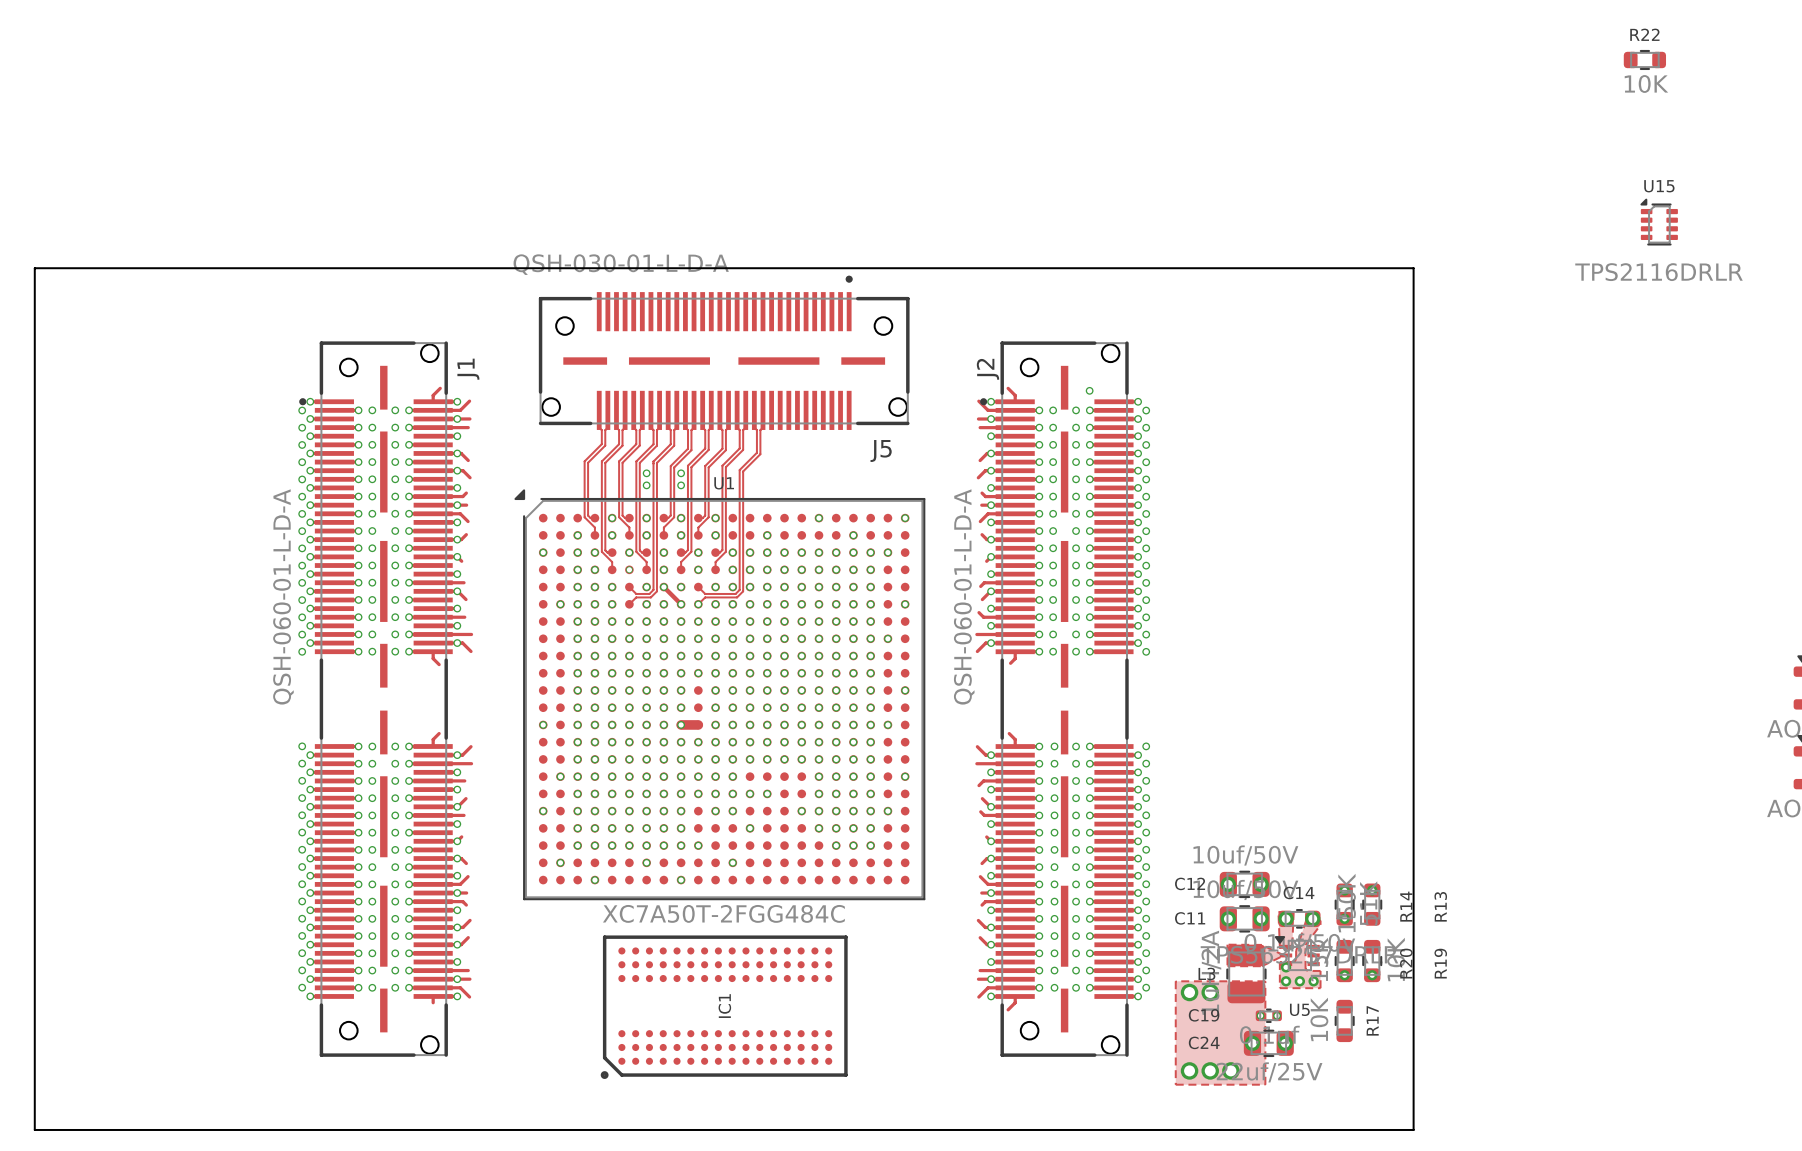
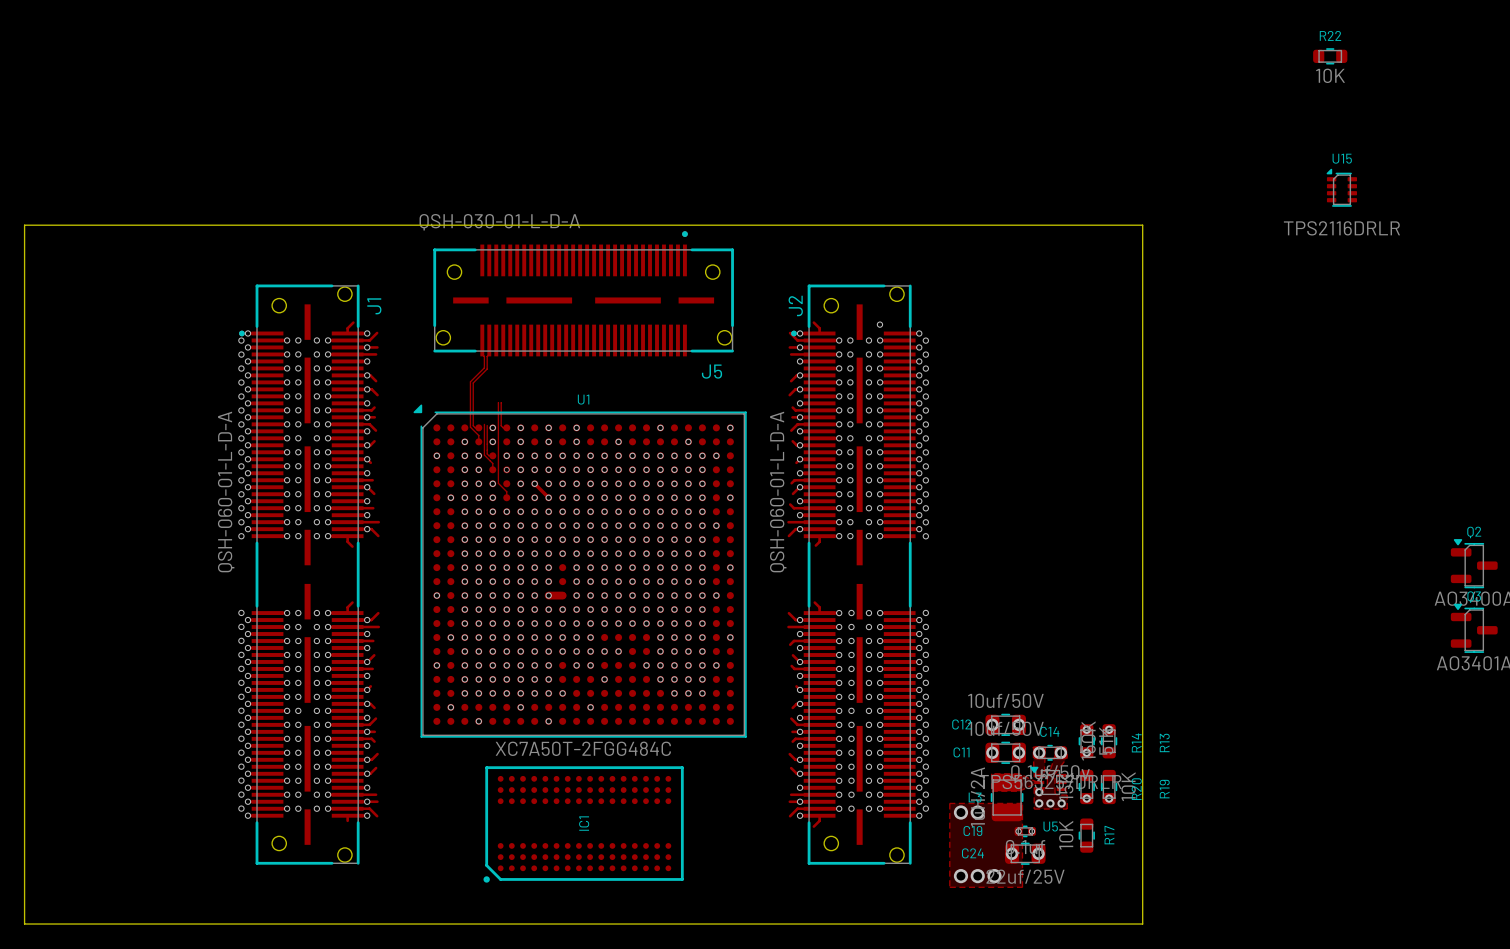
track: (616, 410) (619, 444) (601, 461) (601, 513) -> none
track: (625, 410) (622, 445) (605, 462) (605, 515) -> none
track: (633, 410) (636, 444) (619, 461) (619, 487) -> none
track: (642, 410) (639, 445) (622, 462) (622, 487) -> none
track: (650, 410) (653, 444) (636, 461) (636, 551) (646, 562) (646, 569) -> none
track: (659, 410) (656, 445) (639, 462) (639, 550) (646, 552) -> none
track: (668, 410) (670, 444) (653, 461) (653, 589) (649, 593) (636, 593) (629, 587) -> none
track: (676, 410) (674, 445) (656, 462) (656, 591) (650, 597) (636, 597) (629, 604) -> none
track: (685, 410) (688, 448) (670, 466) (670, 515) (668, 518) (663, 518) -> none
track: (694, 410) (691, 450) (674, 467) (674, 517) (663, 527) (663, 535) -> none
track: (702, 410) (705, 448) (687, 465) (687, 550) (685, 552) (681, 552) -> none
track: (711, 410) (708, 449) (691, 467) (691, 551) (681, 562) (681, 569) -> none
track: (719, 410) (722, 448) (705, 466) (705, 515) (702, 518) (698, 518) -> none
track: (728, 410) (725, 450) (708, 467) (708, 517) (698, 527) (698, 535) -> none
track: (737, 410) (739, 448) (722, 465) (722, 550) (719, 552) (715, 552) -> none
track: (745, 410) (743, 449) (725, 467) (725, 551) (715, 562) (715, 569) -> none
track: (754, 410) (756, 452) (739, 470) (739, 589) (735, 593) (705, 593) (698, 587) -> none
track: (762, 410) (760, 454) (743, 471) (743, 591) (737, 597) (705, 597) (698, 604) -> none
via: (646, 473) -> none
via: (681, 473) -> none
via: (646, 485) -> none
via: (681, 485) -> none
track: (619, 517) (629, 527) (629, 535) -> (498, 427) (498, 483) (506, 491) (506, 497)
via: none -> (520, 455)
via: none -> (548, 455)
via: none -> (576, 455)
via: none -> (520, 469)
via: none -> (548, 469)
via: none -> (576, 469)
via: none -> (562, 483)

